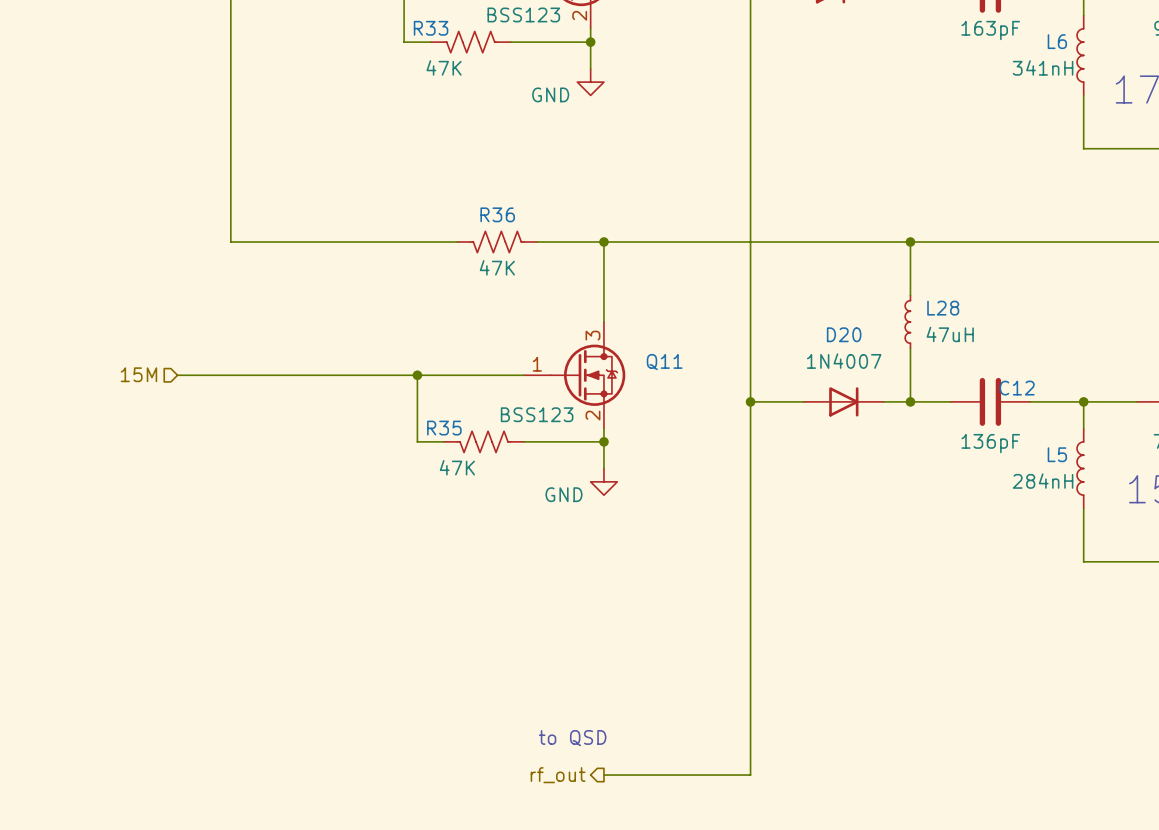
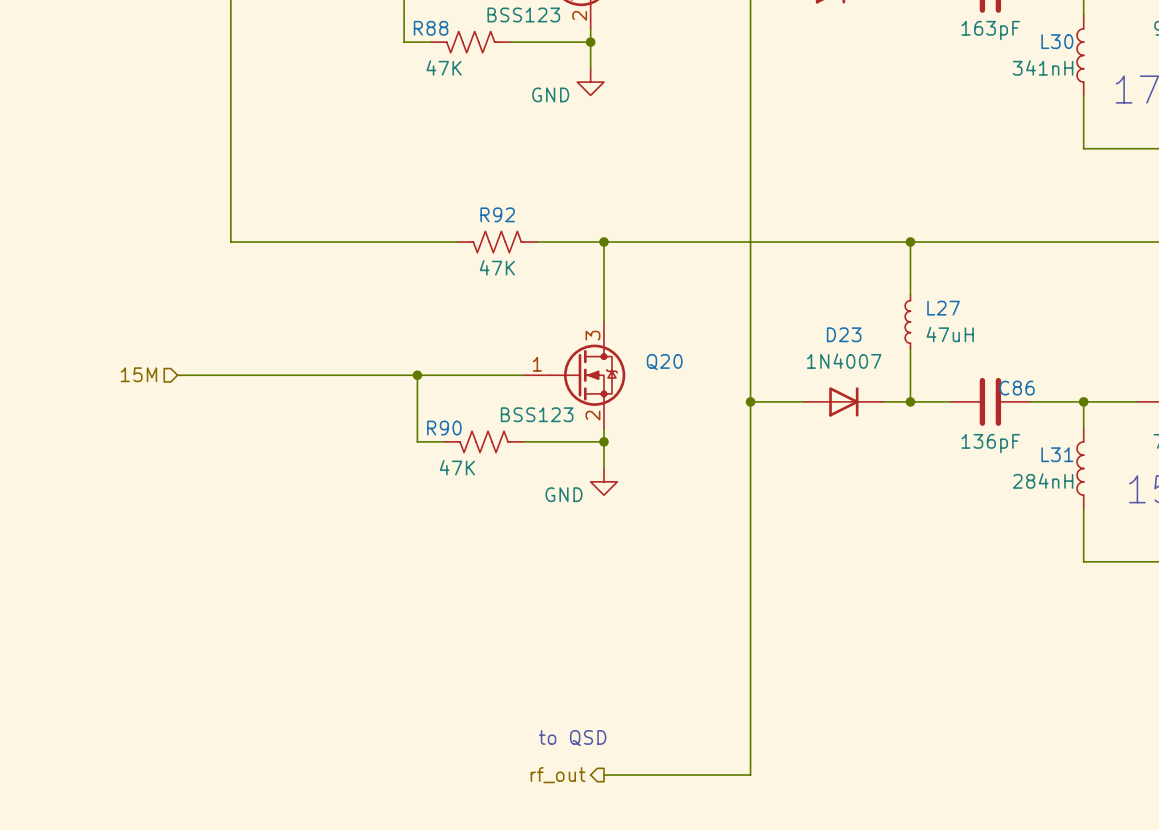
R33 name: R33 (431, 28) -> R88 (431, 28)
L6 name: L6 (1057, 41) -> L30 (1057, 41)
R36 name: R36 (497, 214) -> R92 (497, 214)
L28 name: L28 (943, 308) -> L27 (943, 308)
D20 name: D20 (844, 334) -> D23 (844, 334)
Q11 name: Q11 (664, 362) -> Q20 (664, 362)
C12 name: C12 (1017, 388) -> C86 (1017, 388)
R35 name: R35 (444, 428) -> R90 (444, 428)
L5 name: L5 (1057, 454) -> L31 (1057, 454)

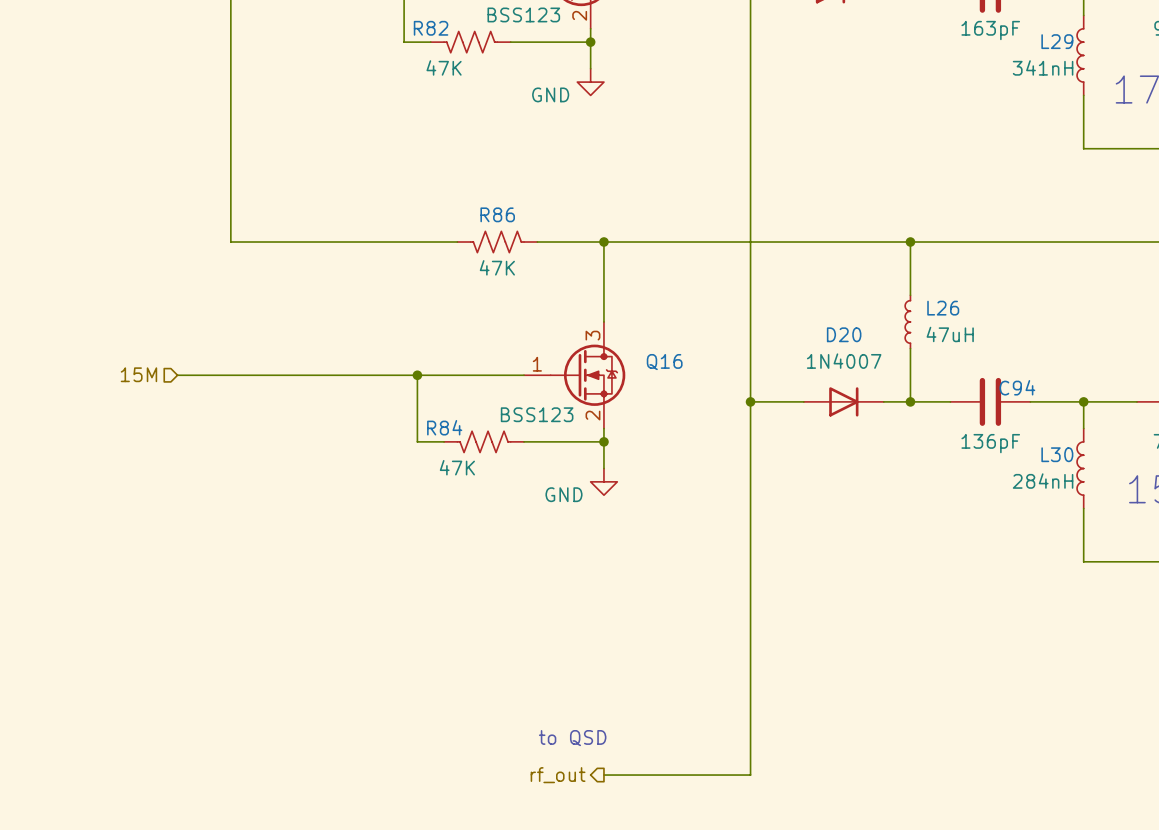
R88 name: R88 (431, 28) -> R82 (431, 28)
L30 name: L30 (1057, 41) -> L29 (1057, 41)
R92 name: R92 (497, 214) -> R86 (497, 214)
L27 name: L27 (943, 308) -> L26 (943, 308)
D23 name: D23 (844, 334) -> D20 (844, 334)
Q20 name: Q20 (664, 362) -> Q16 (664, 362)
C86 name: C86 (1017, 388) -> C94 (1017, 387)
R90 name: R90 (444, 428) -> R84 (444, 427)
L31 name: L31 (1057, 454) -> L30 (1057, 454)

